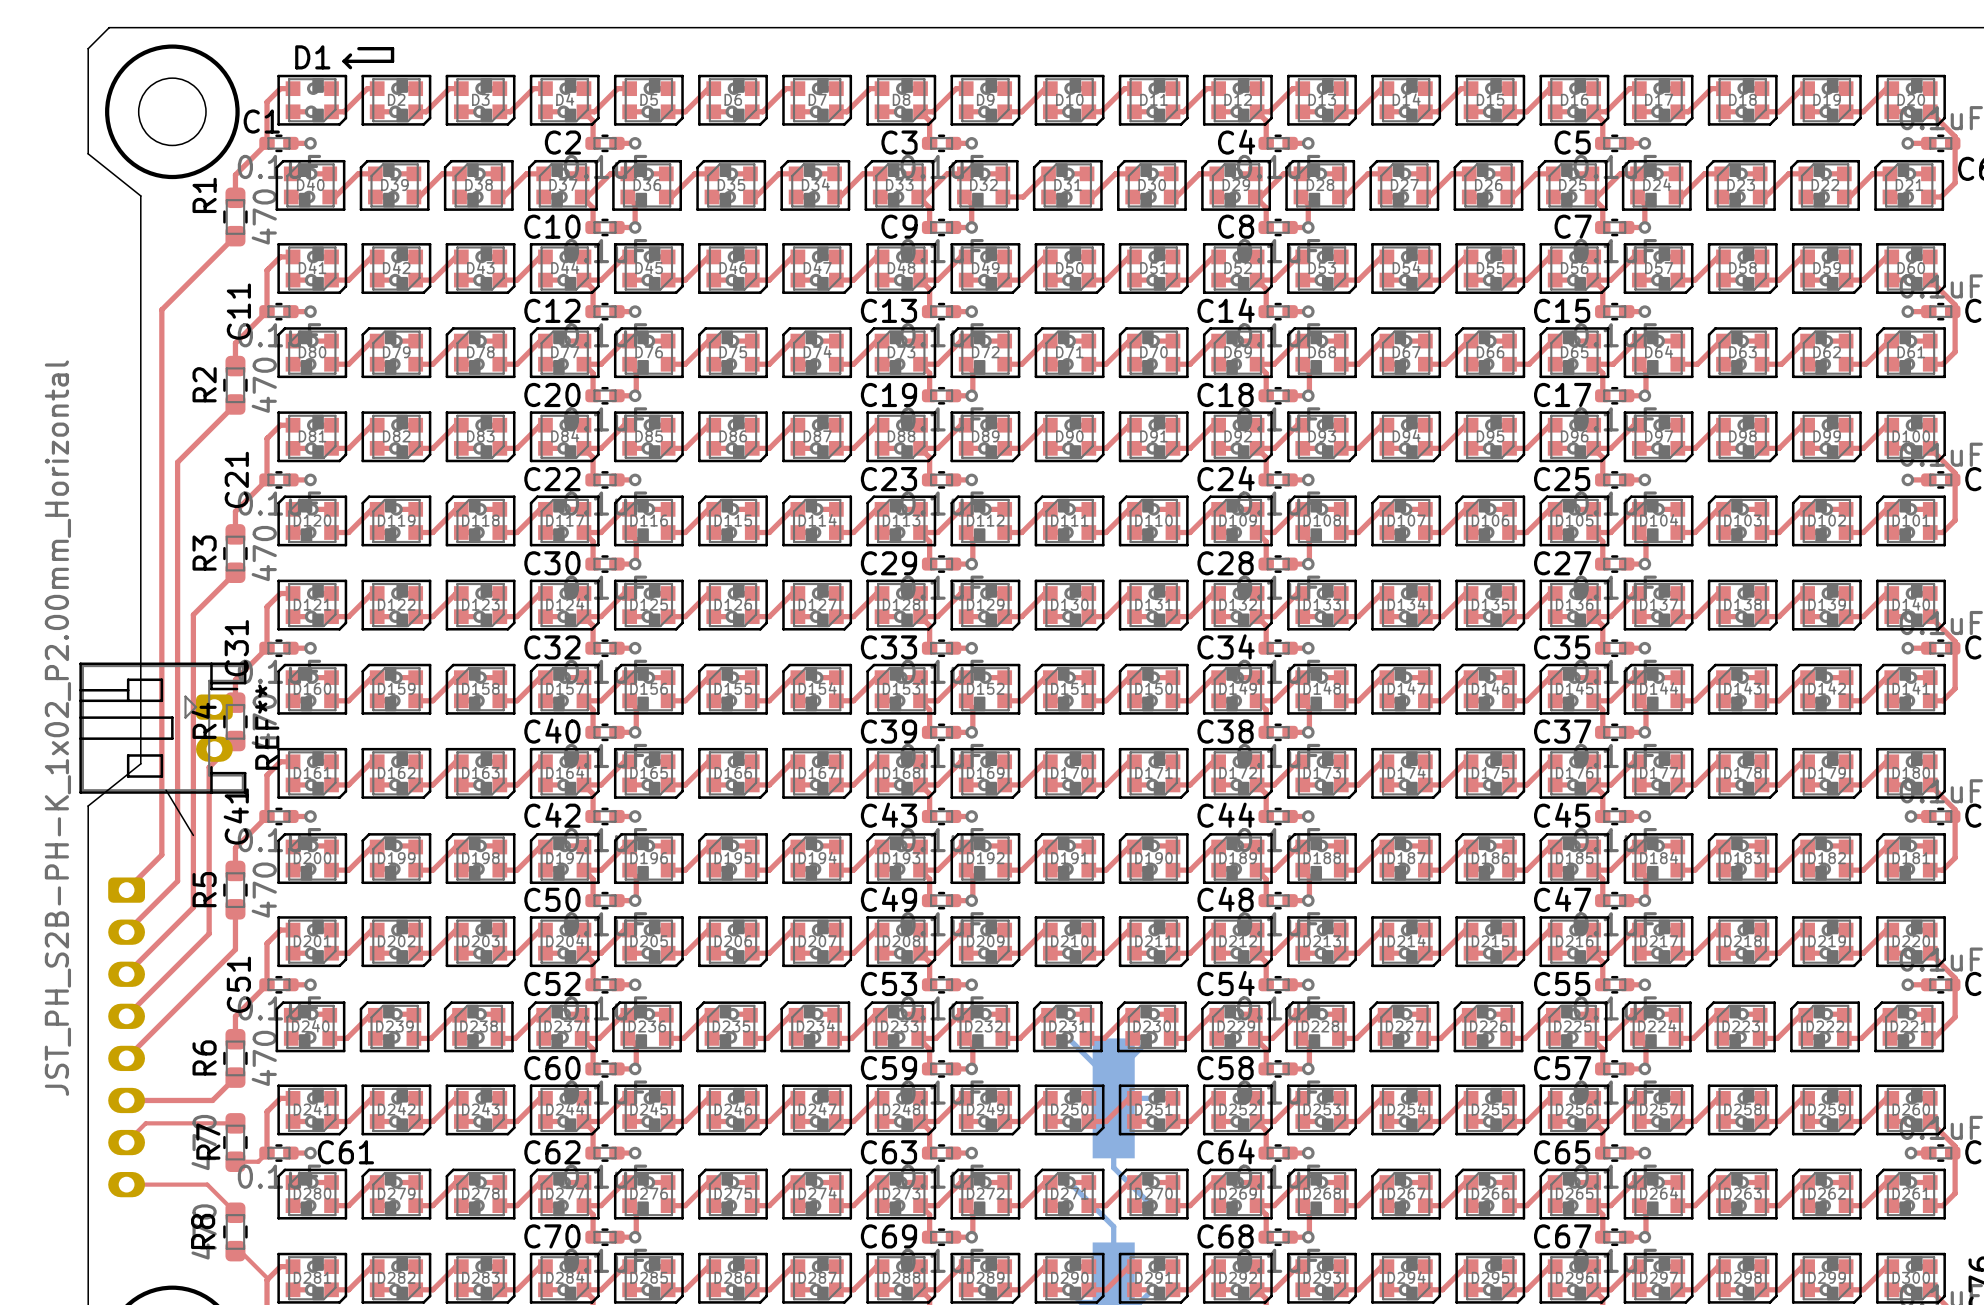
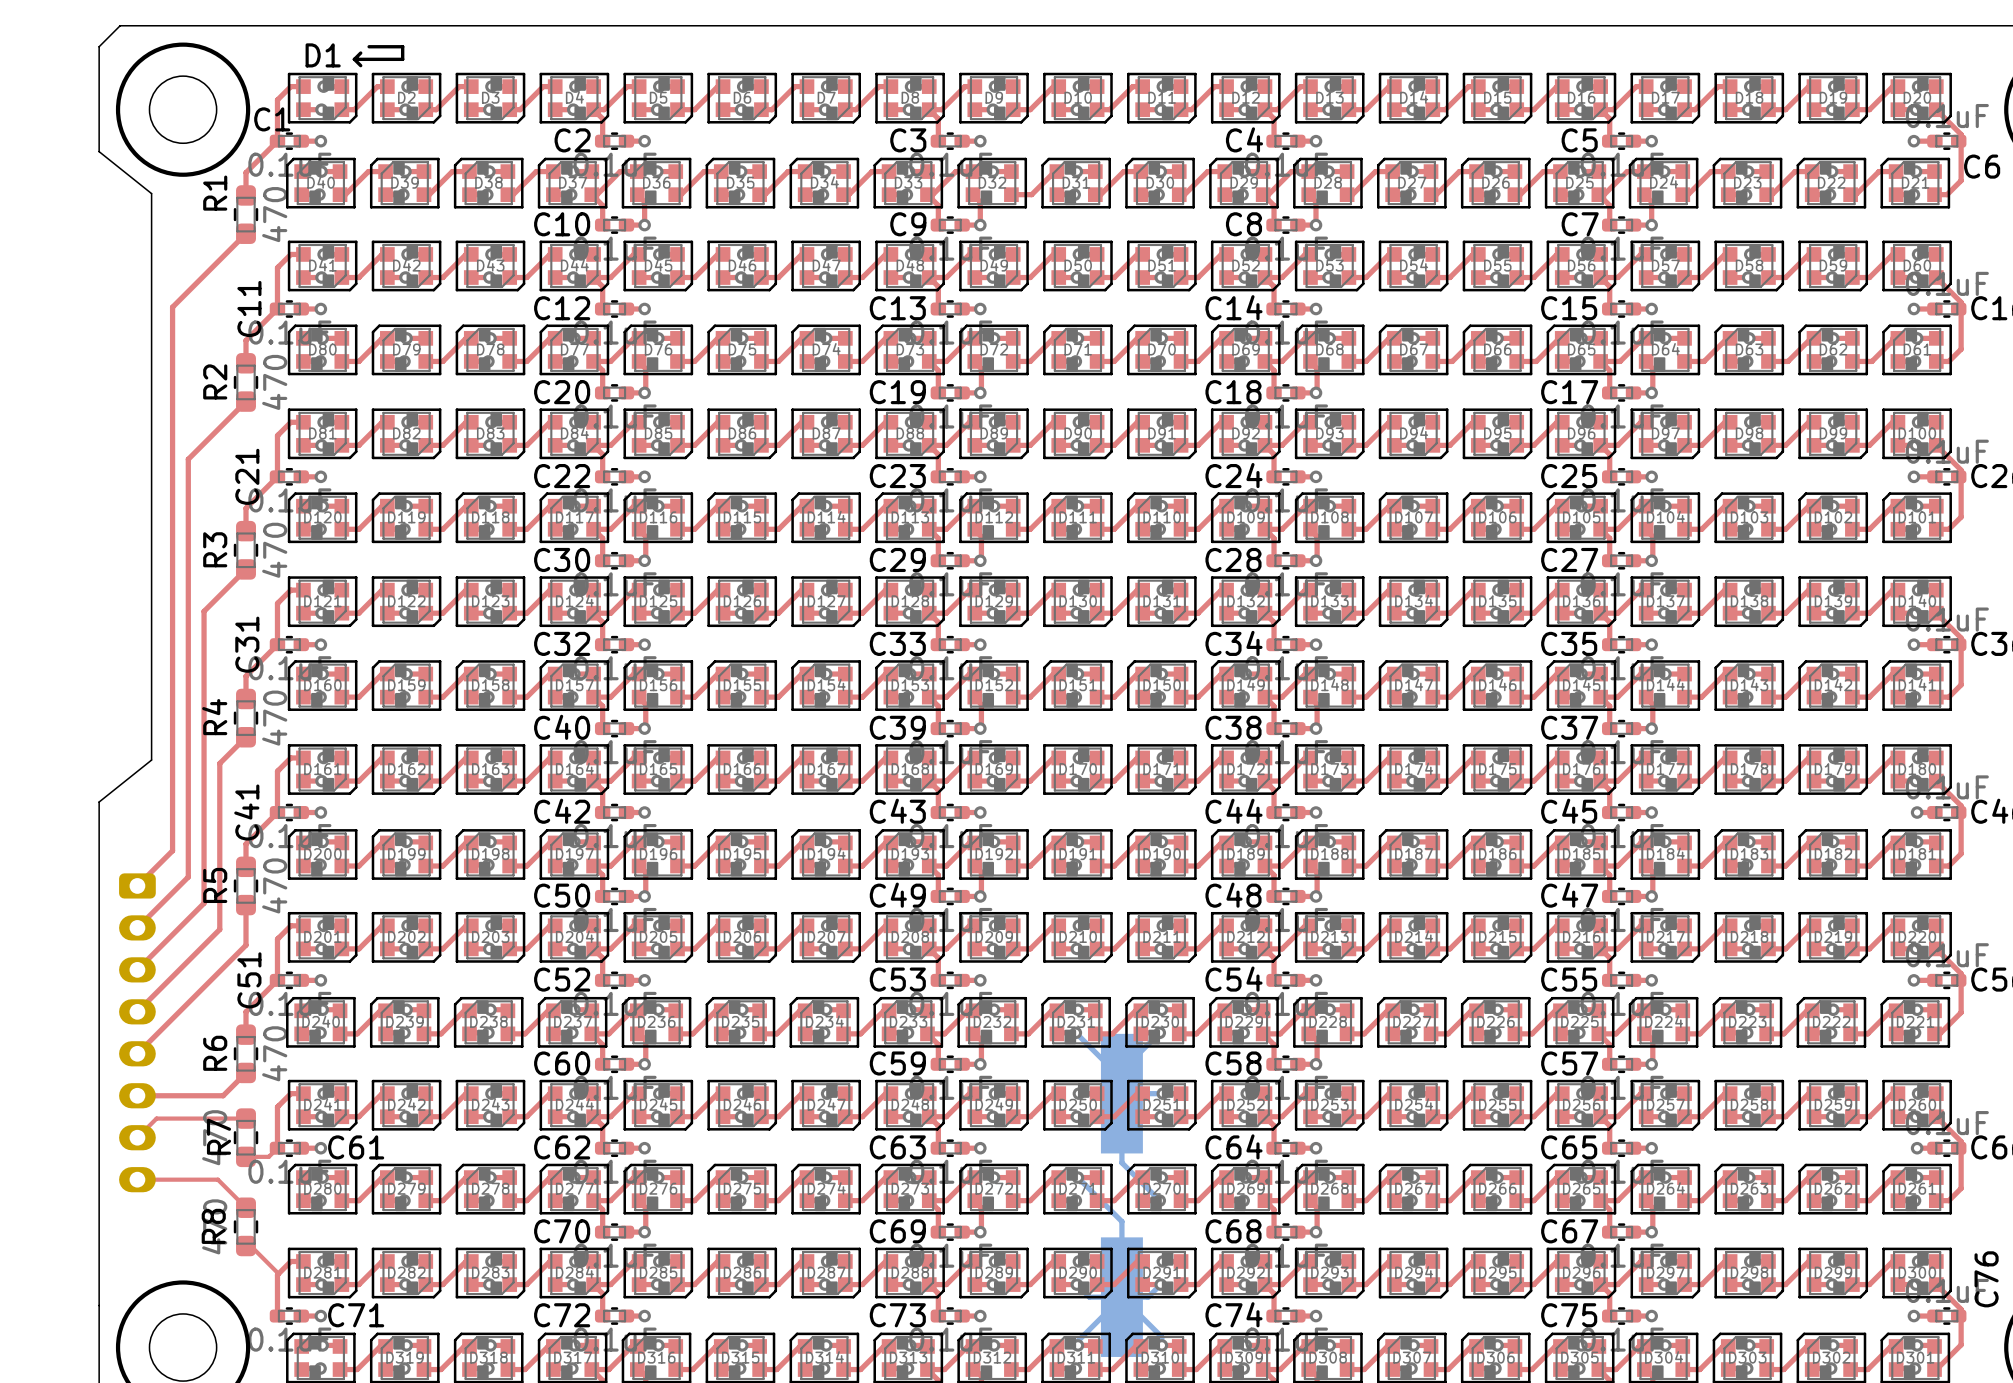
REF**: JST_PH_S2B-PH-K_1x02_P2.00mm_Horizontal (162, 728) -> none
board edge: (166, 790) (193, 835) -> none

